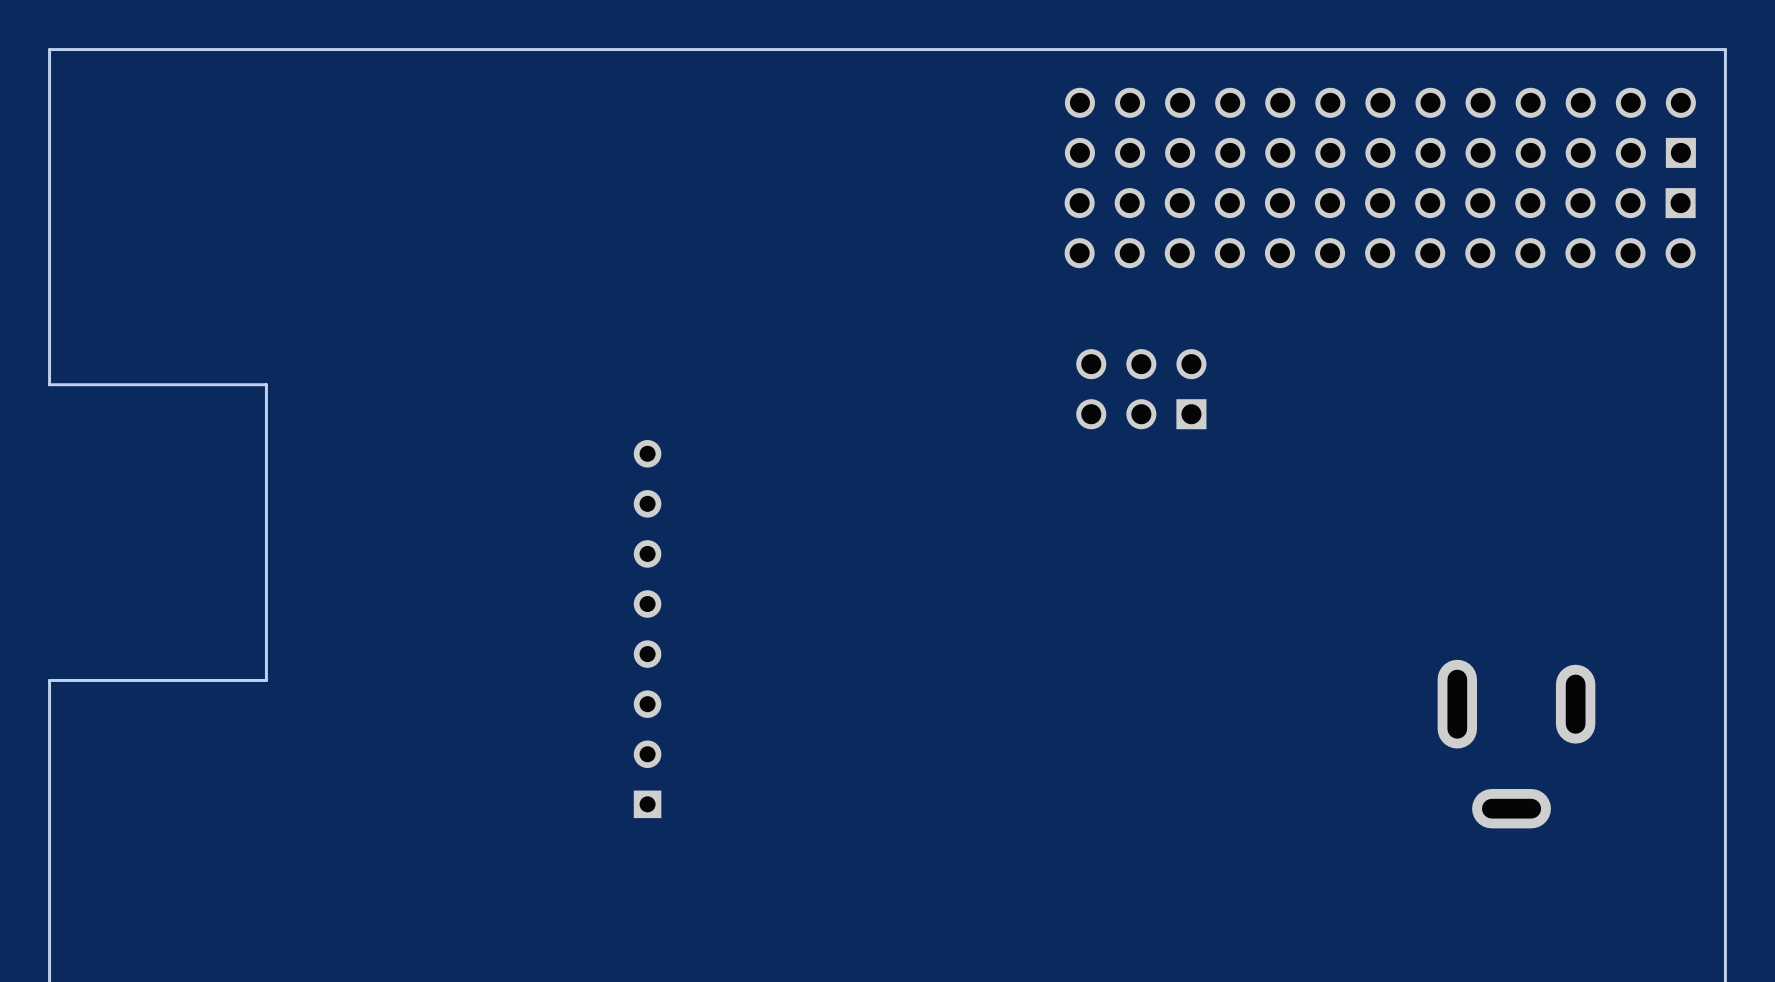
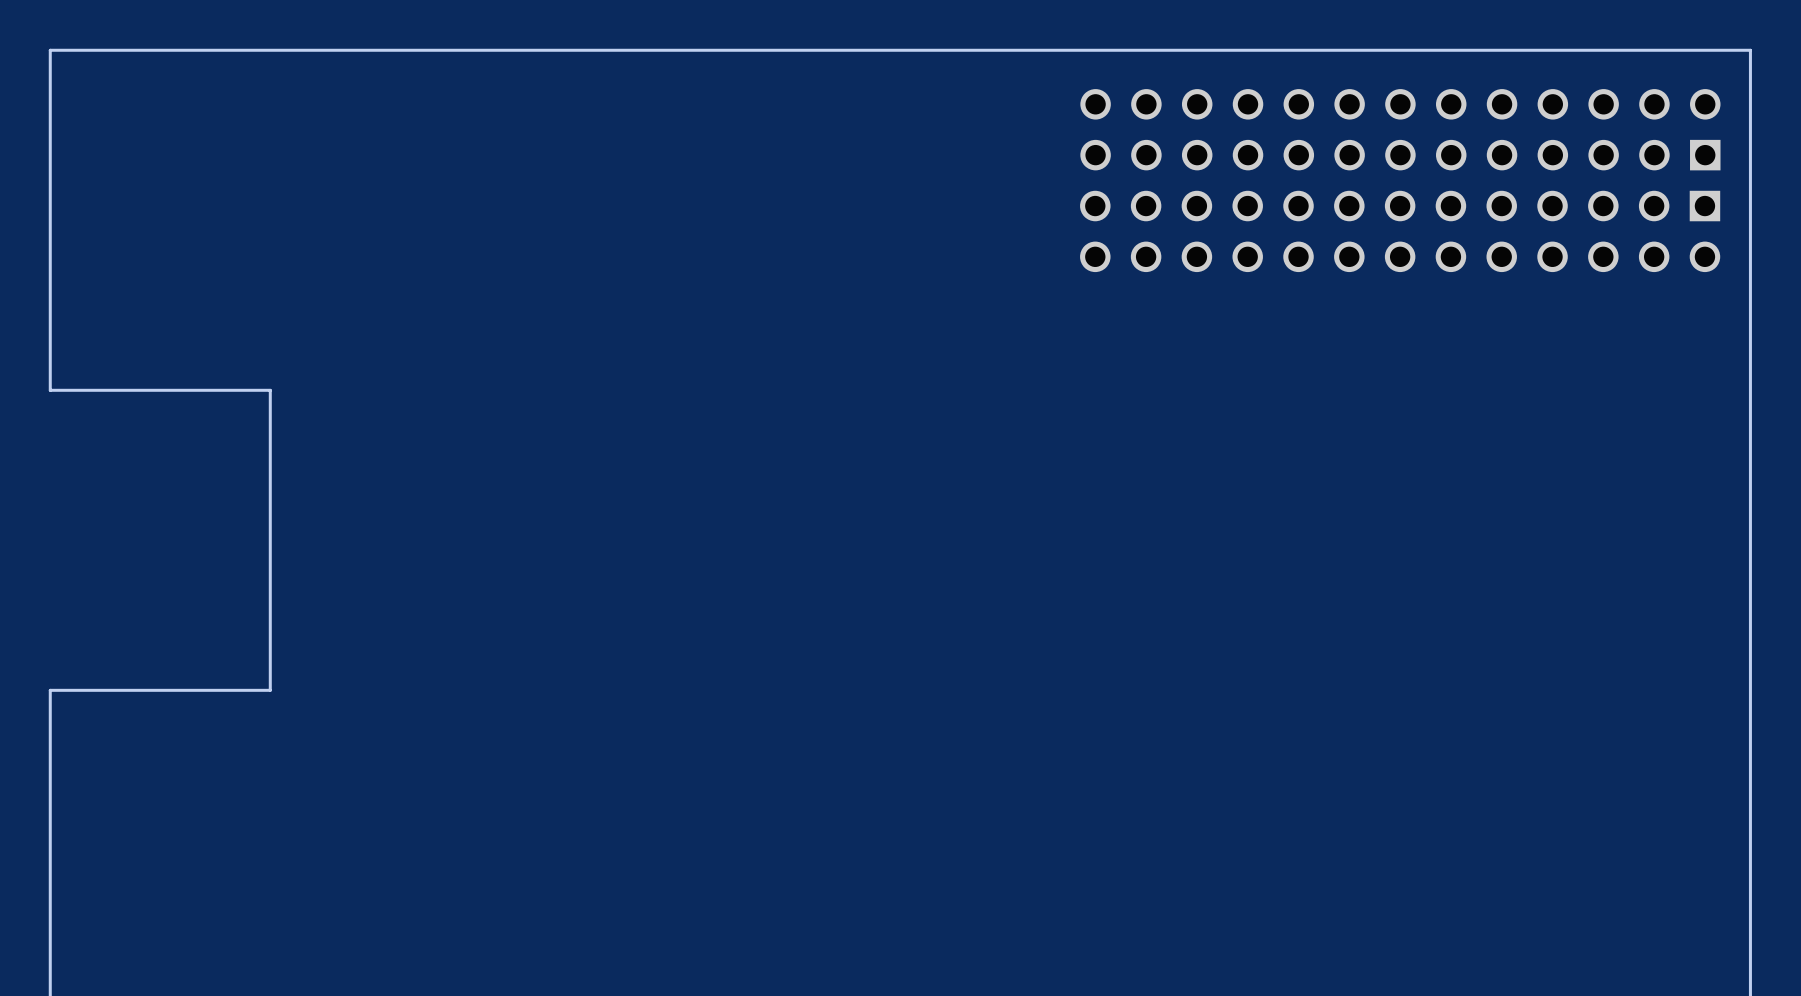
part: (1141, 389) -> none
part: (647, 629) -> none
part: (1516, 744) -> none

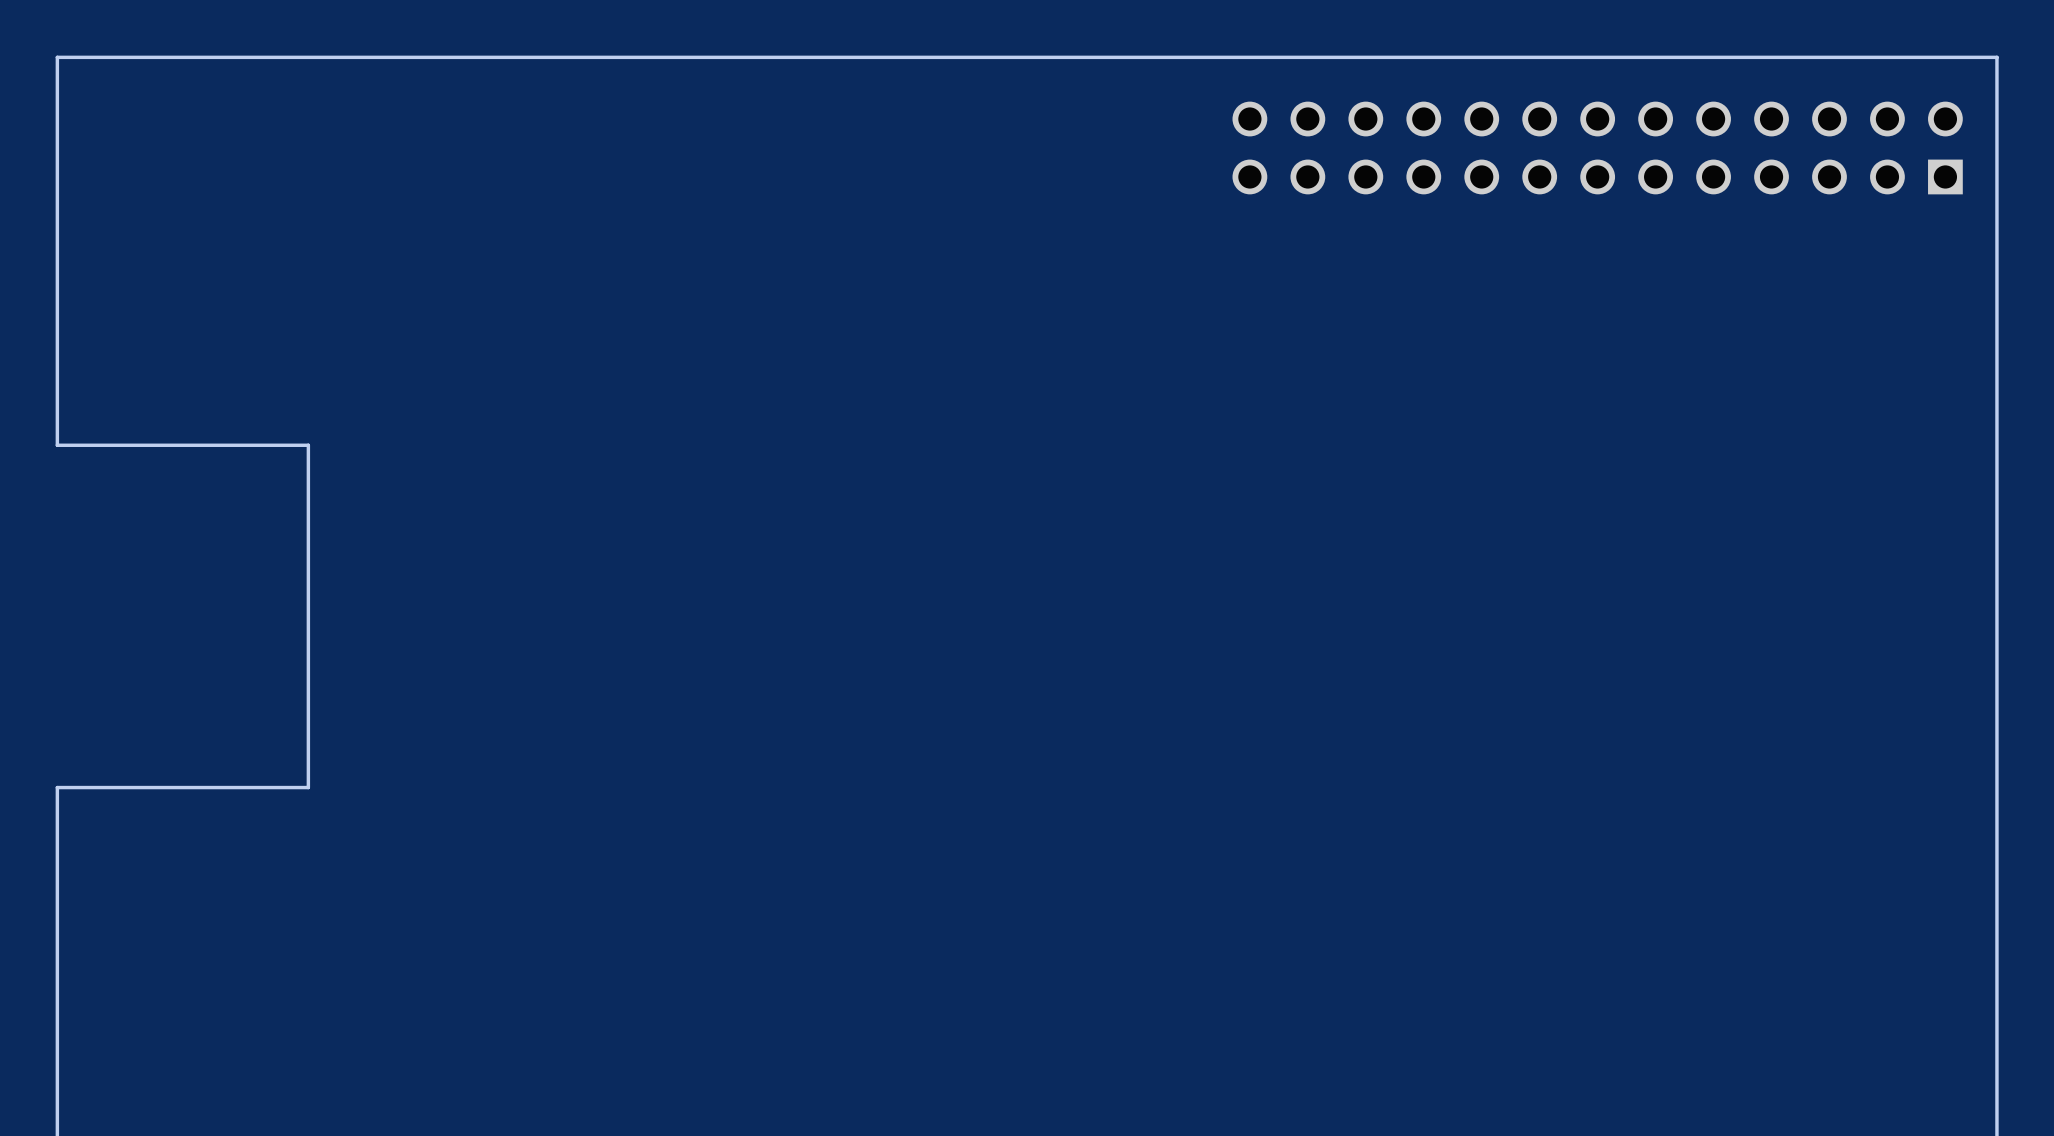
part: (1400, 231) -> none

